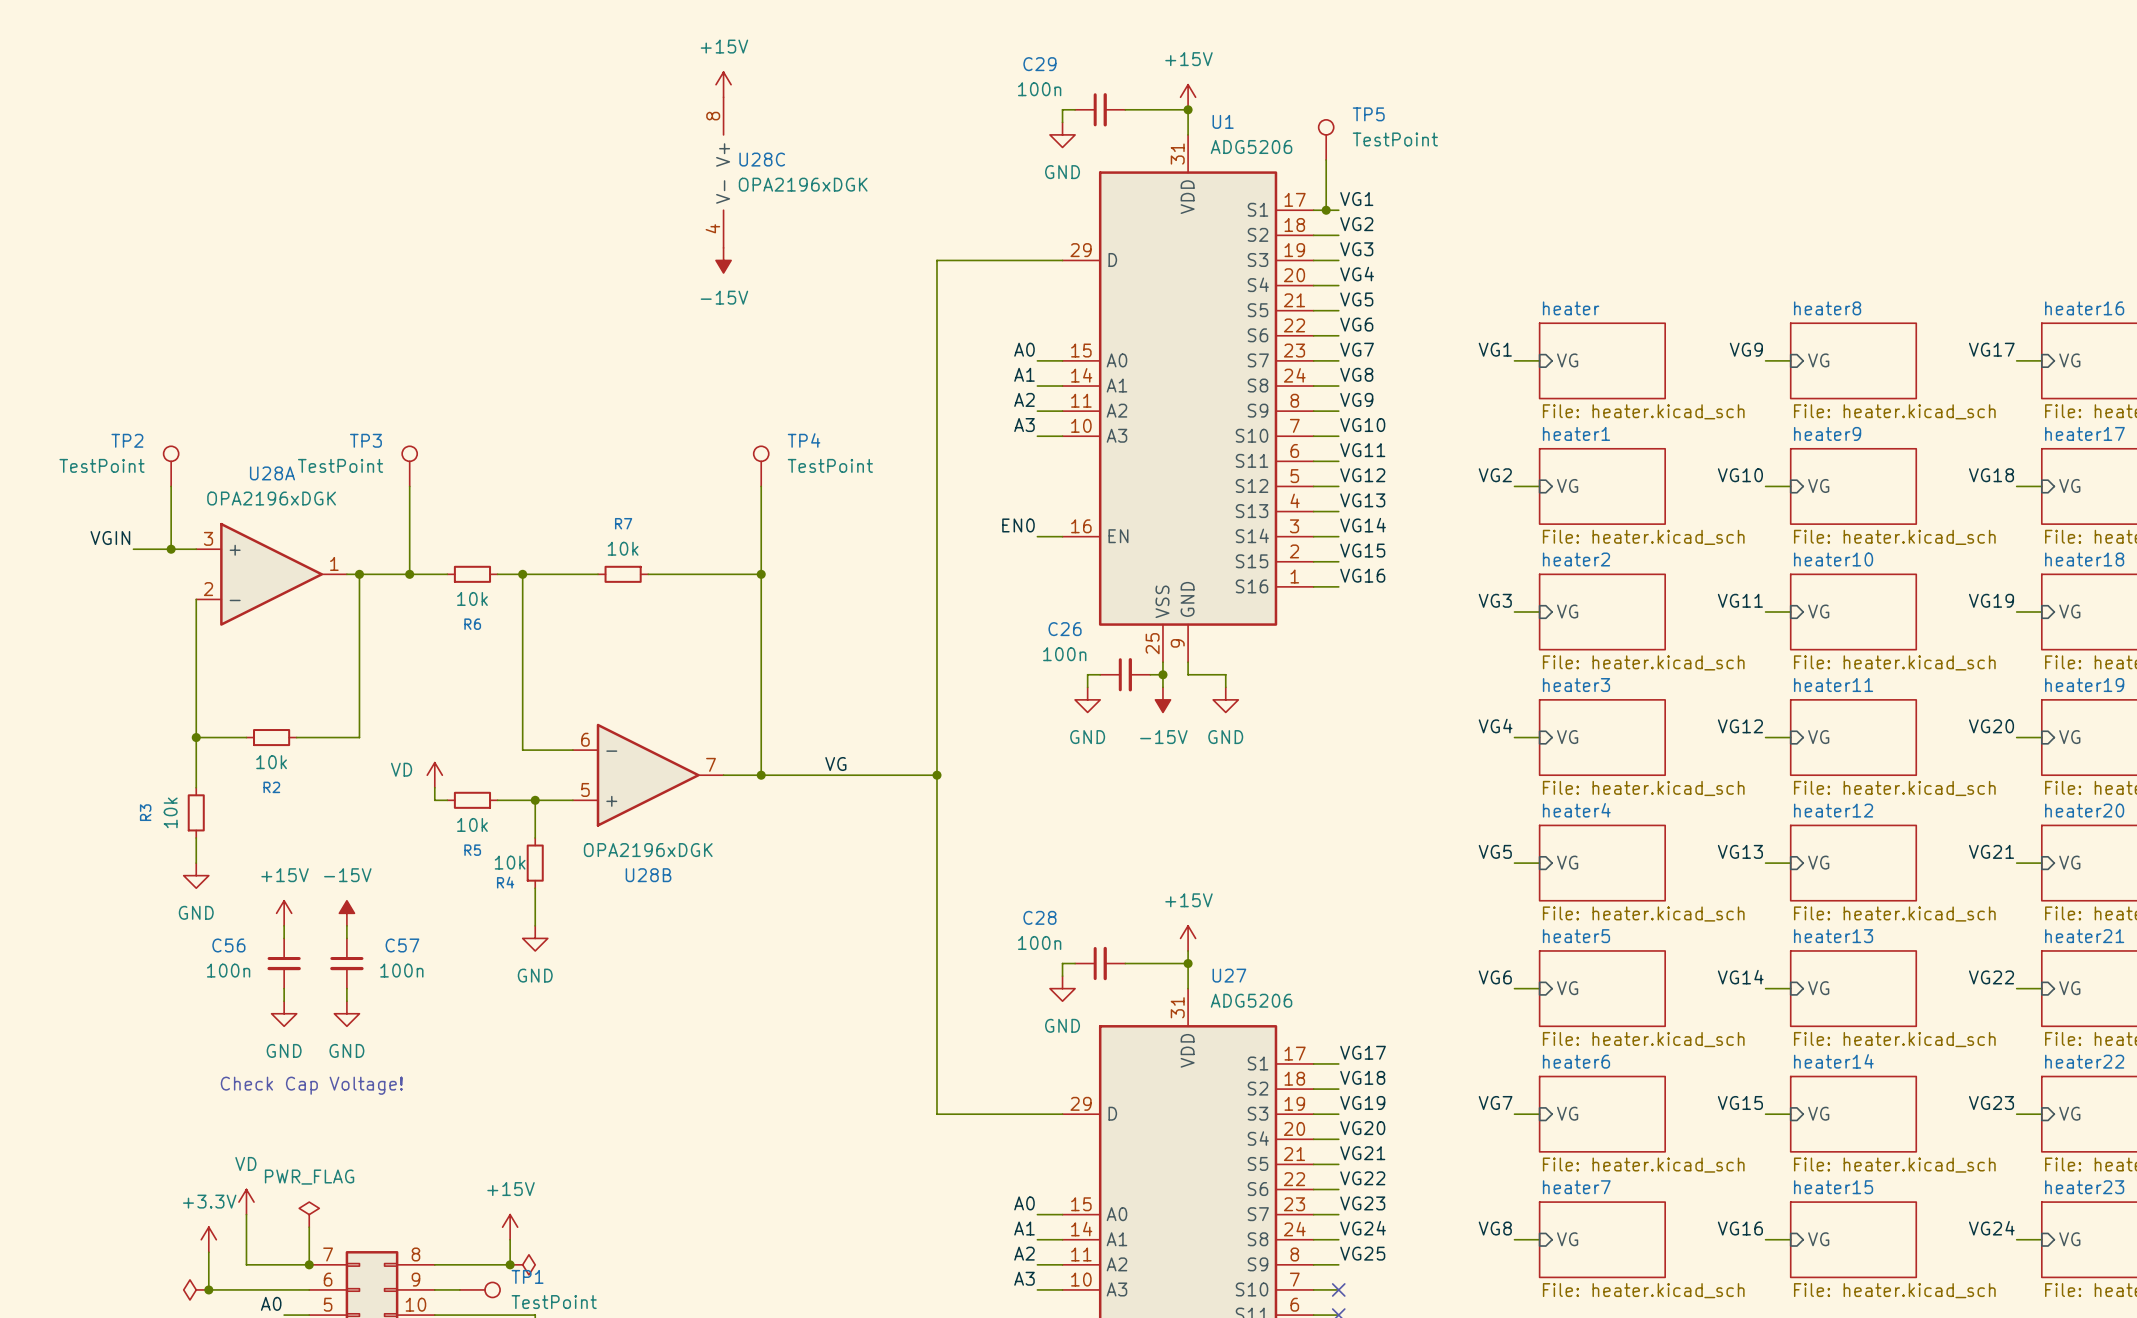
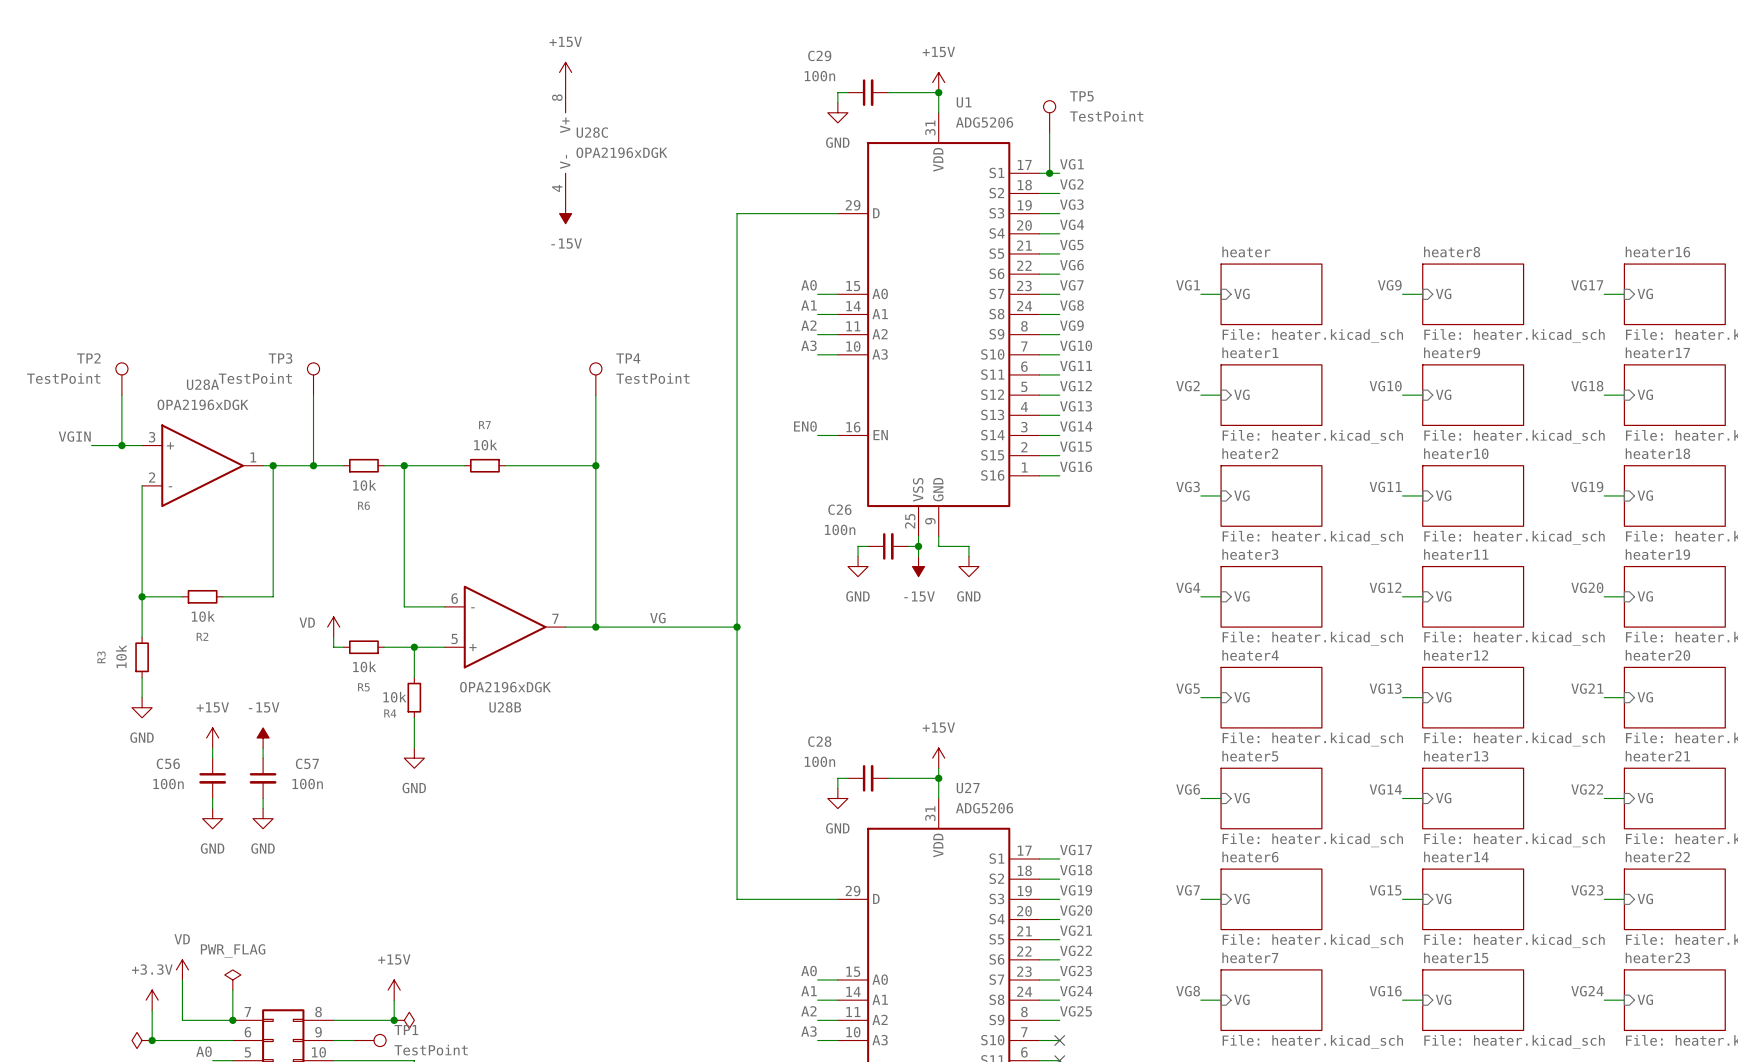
text: Check Cap Voltage! (311, 1085) -> none

